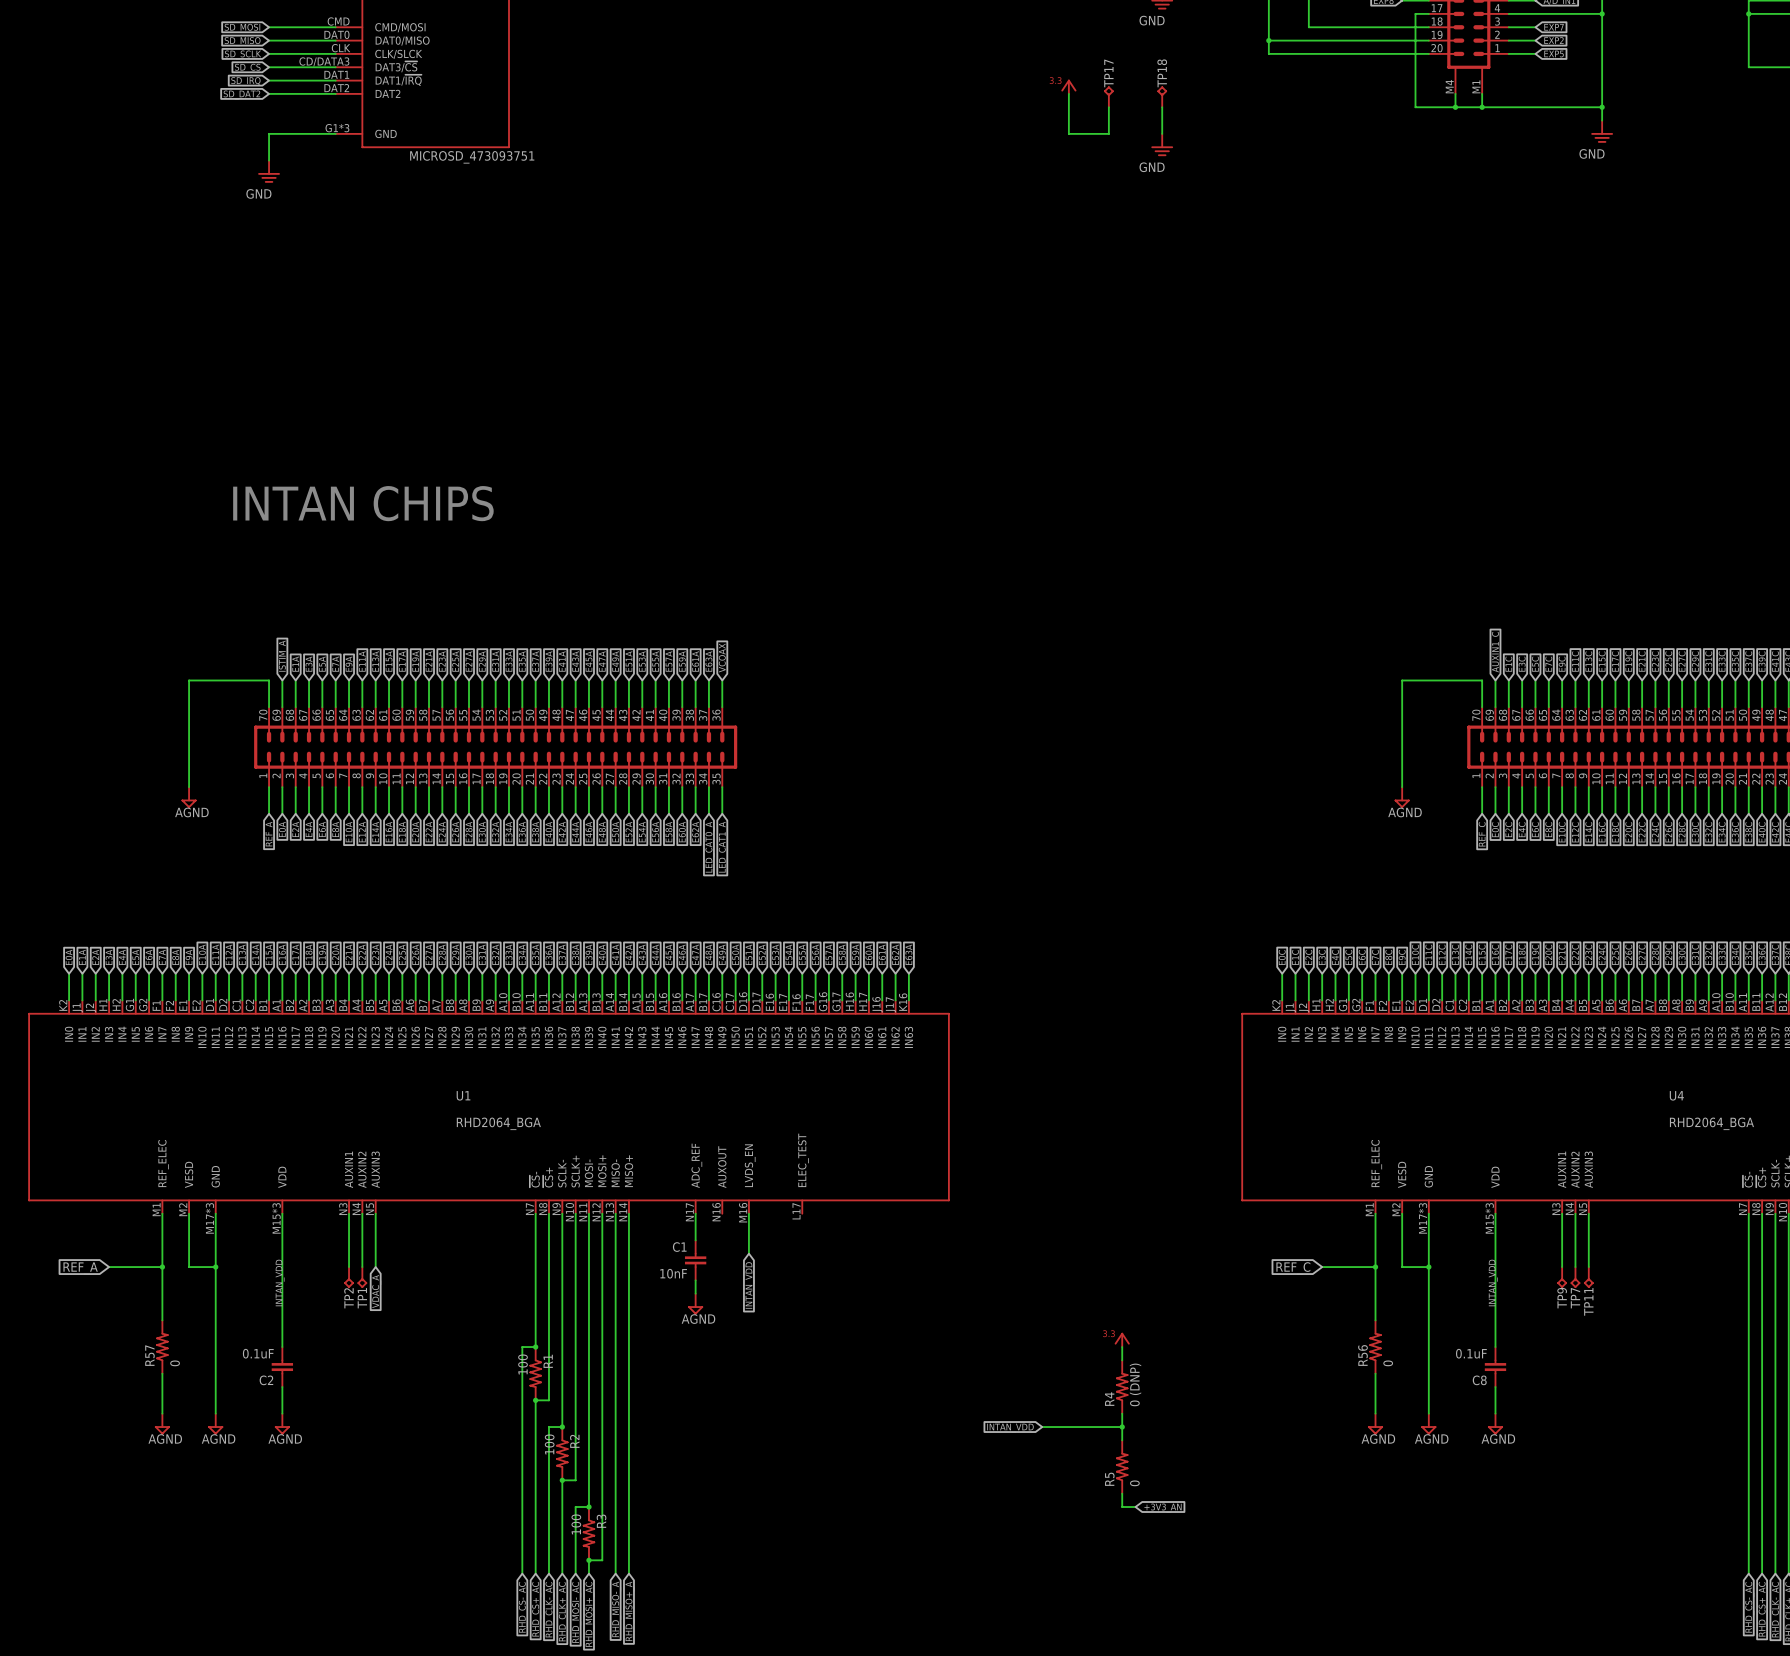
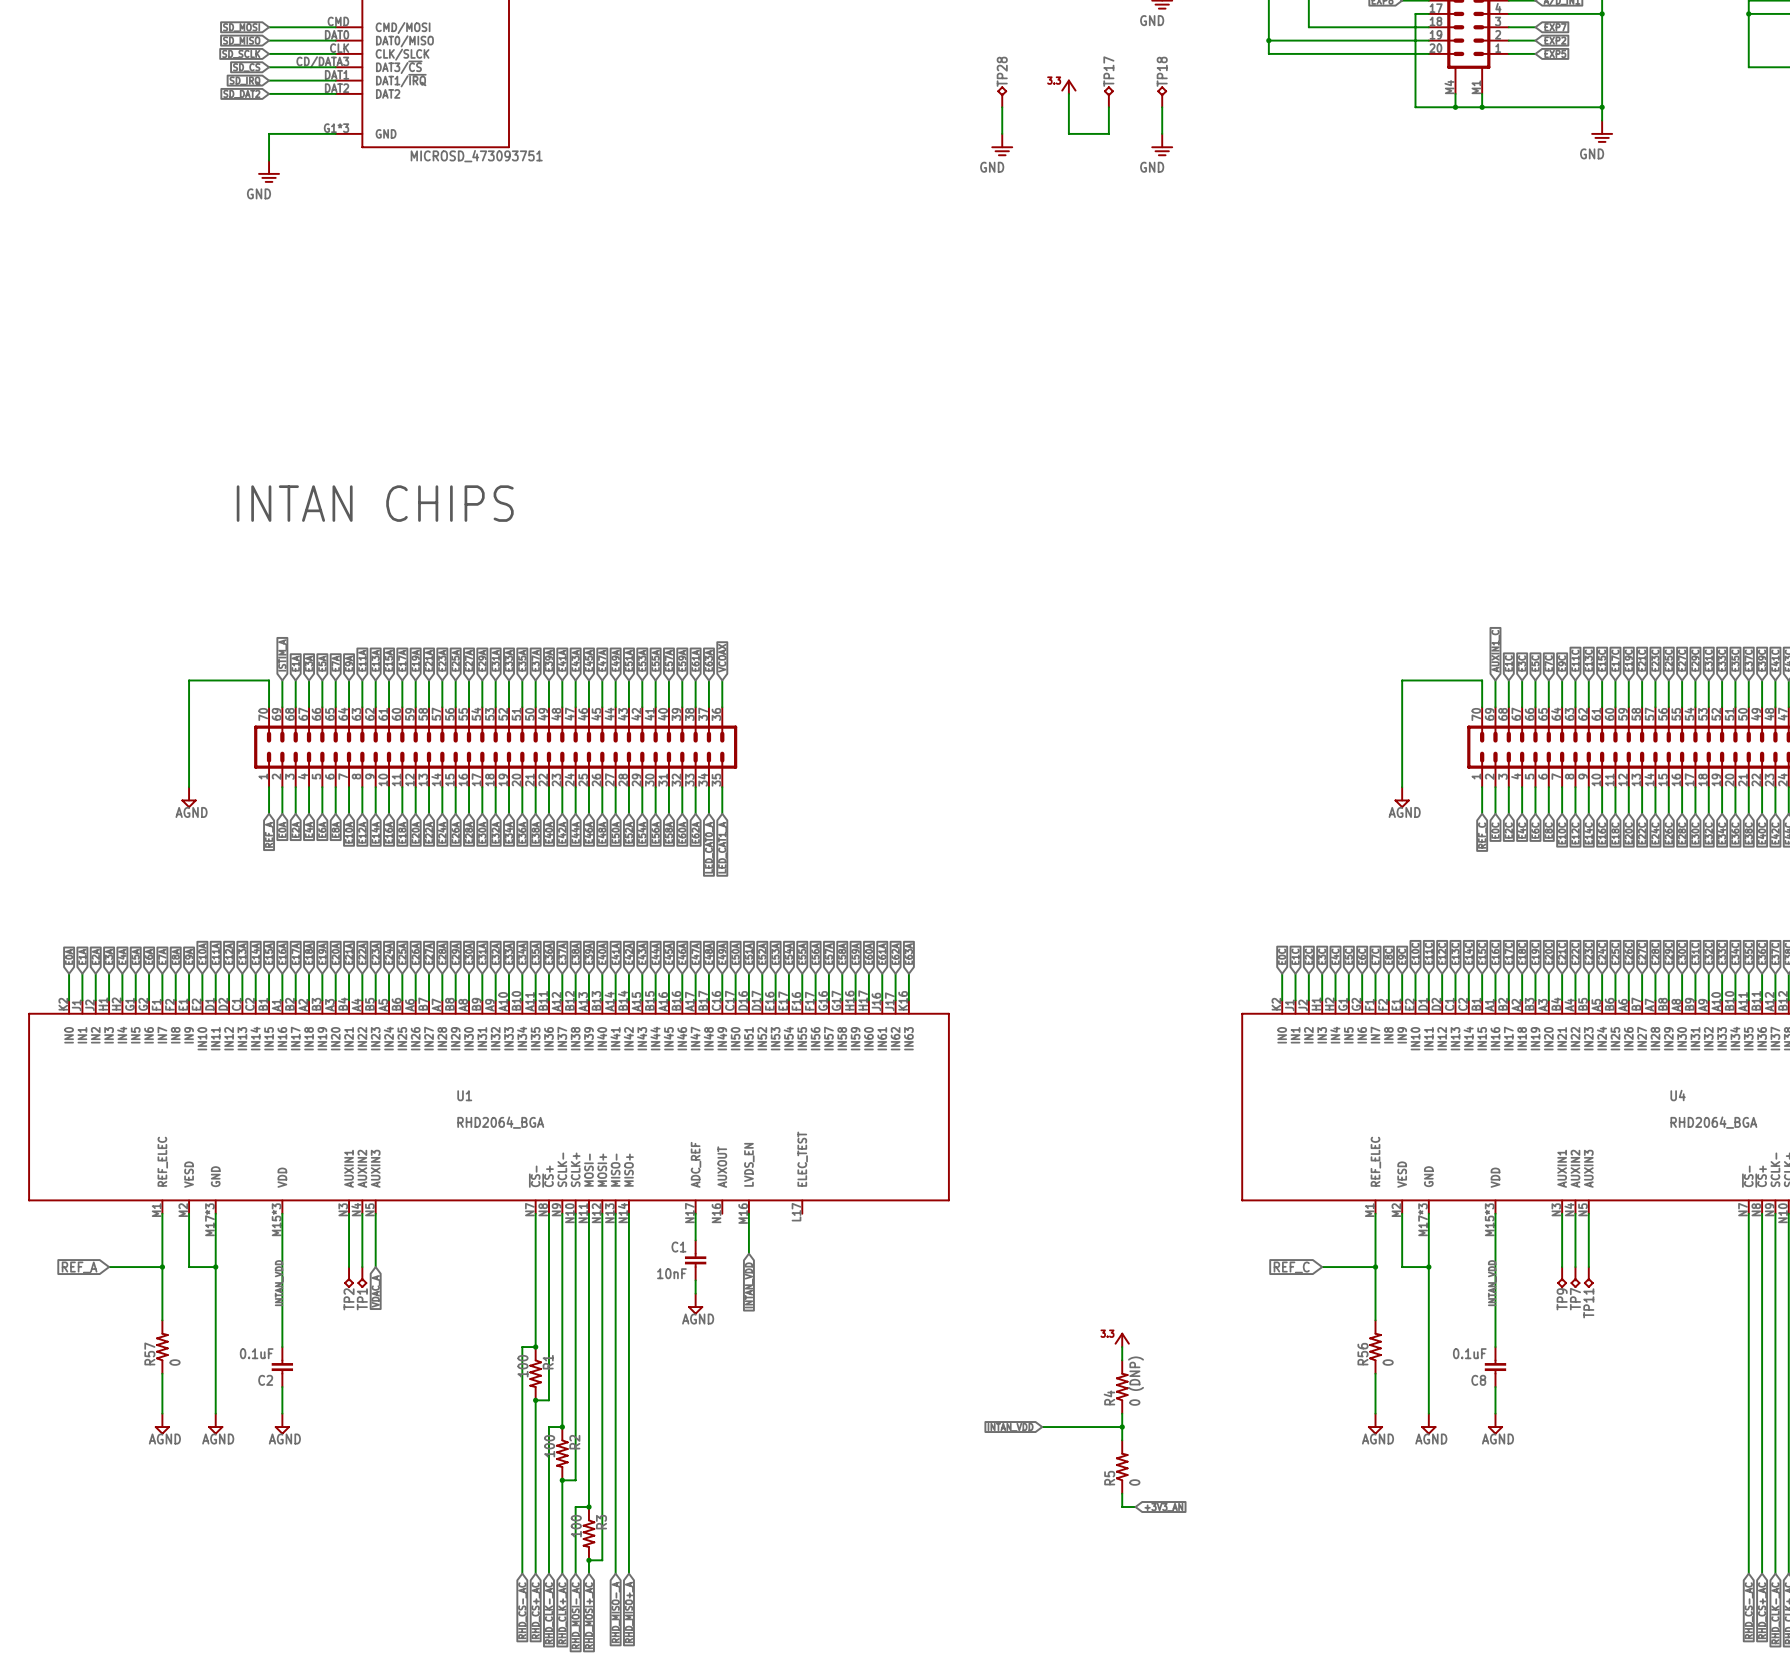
TP28: none -> (1002, 96)
wire: none -> (1002, 107) (1002, 133)
power symbol: none -> GND (1002, 144)

